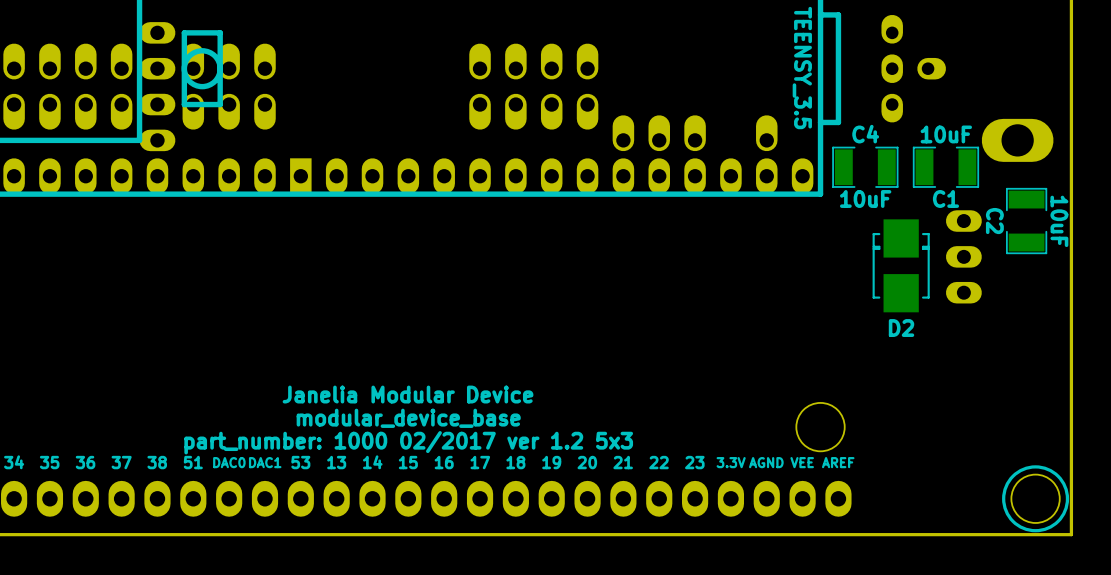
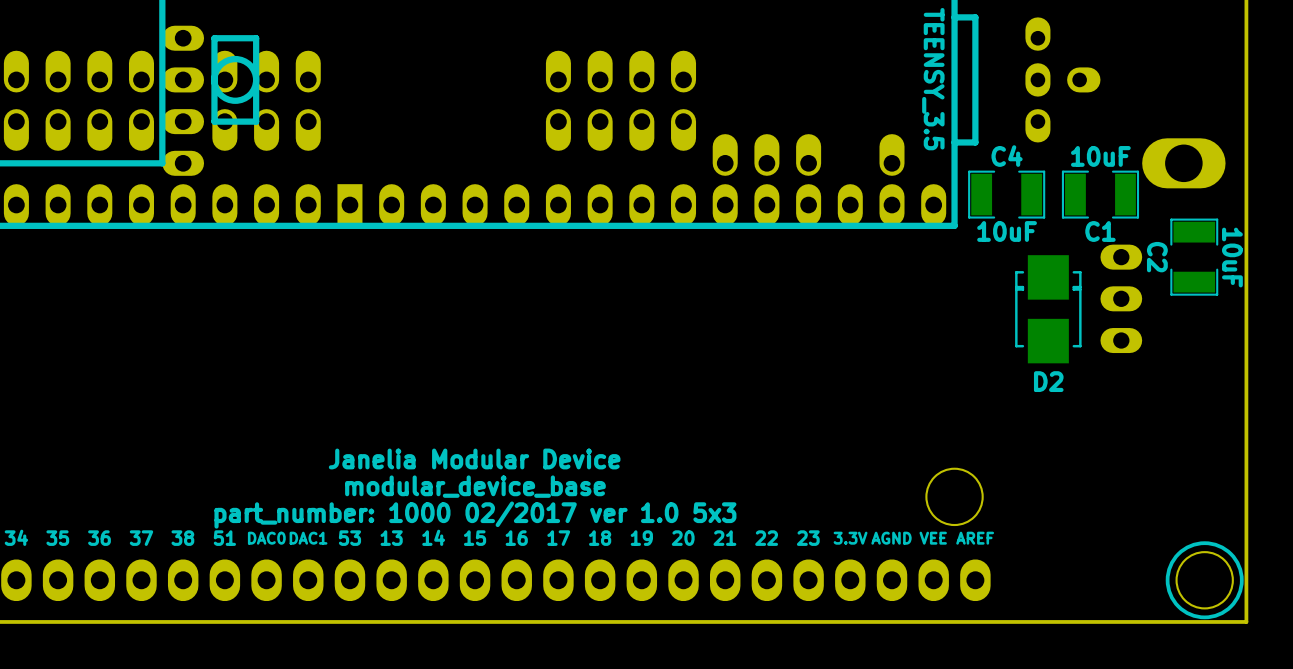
text: part_number: 1000 02/2017 ver 1.2 5x3 (408, 442) -> part_number: 1000 02/2017 ver 1.0 5x3 (475, 515)

